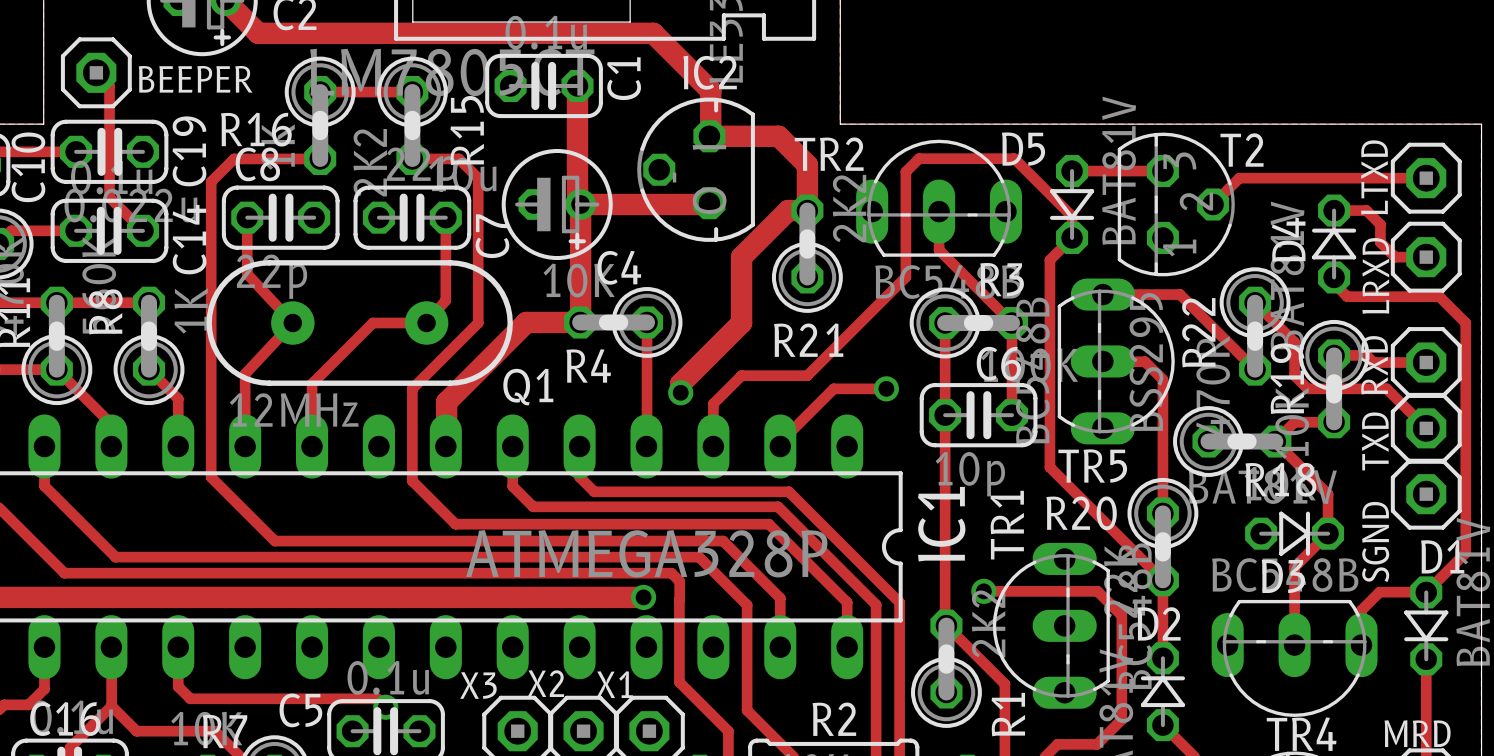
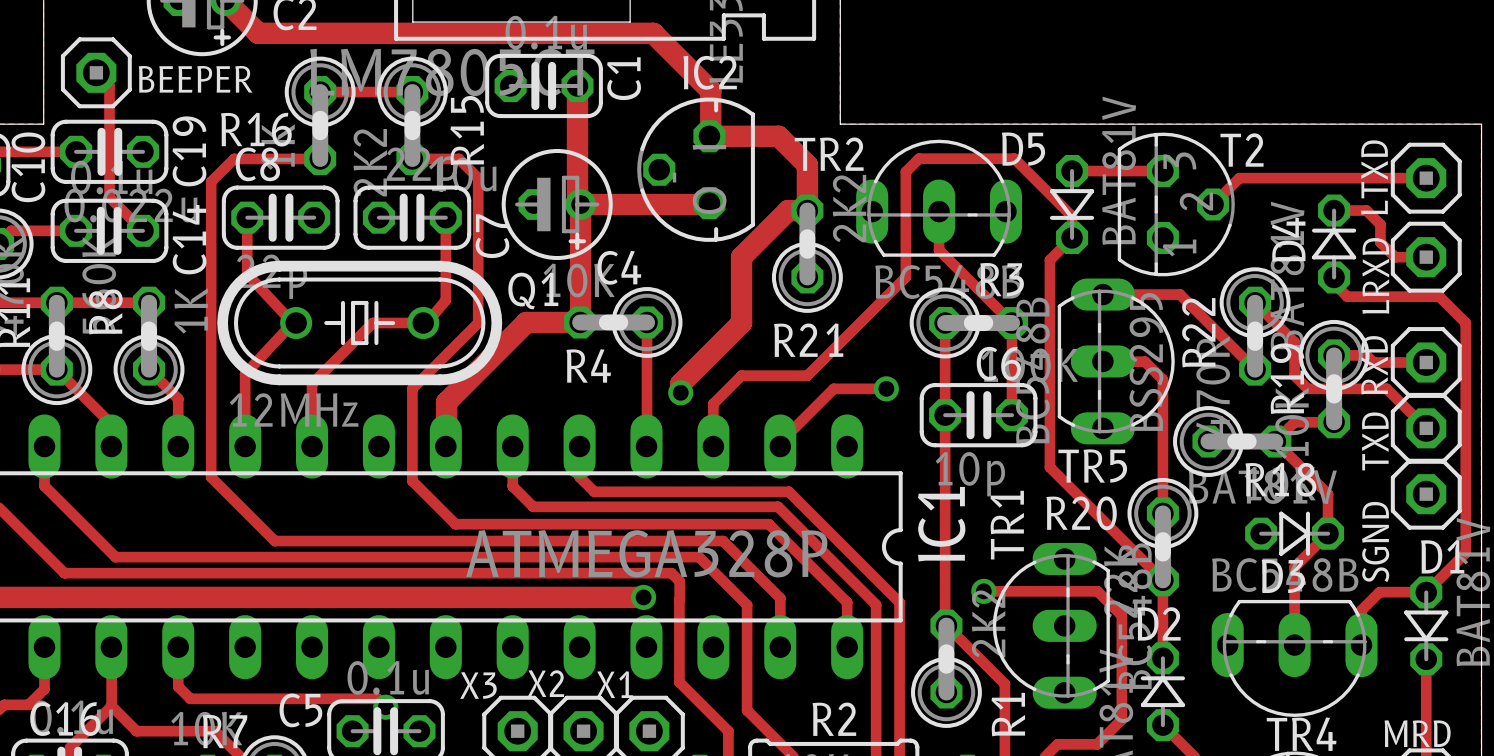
Q1 footprint: [206, 260, 513, 386] -> [217, 260, 503, 386]
Q1 name position: Q1 (528, 387) -> Q1 (533, 290)

